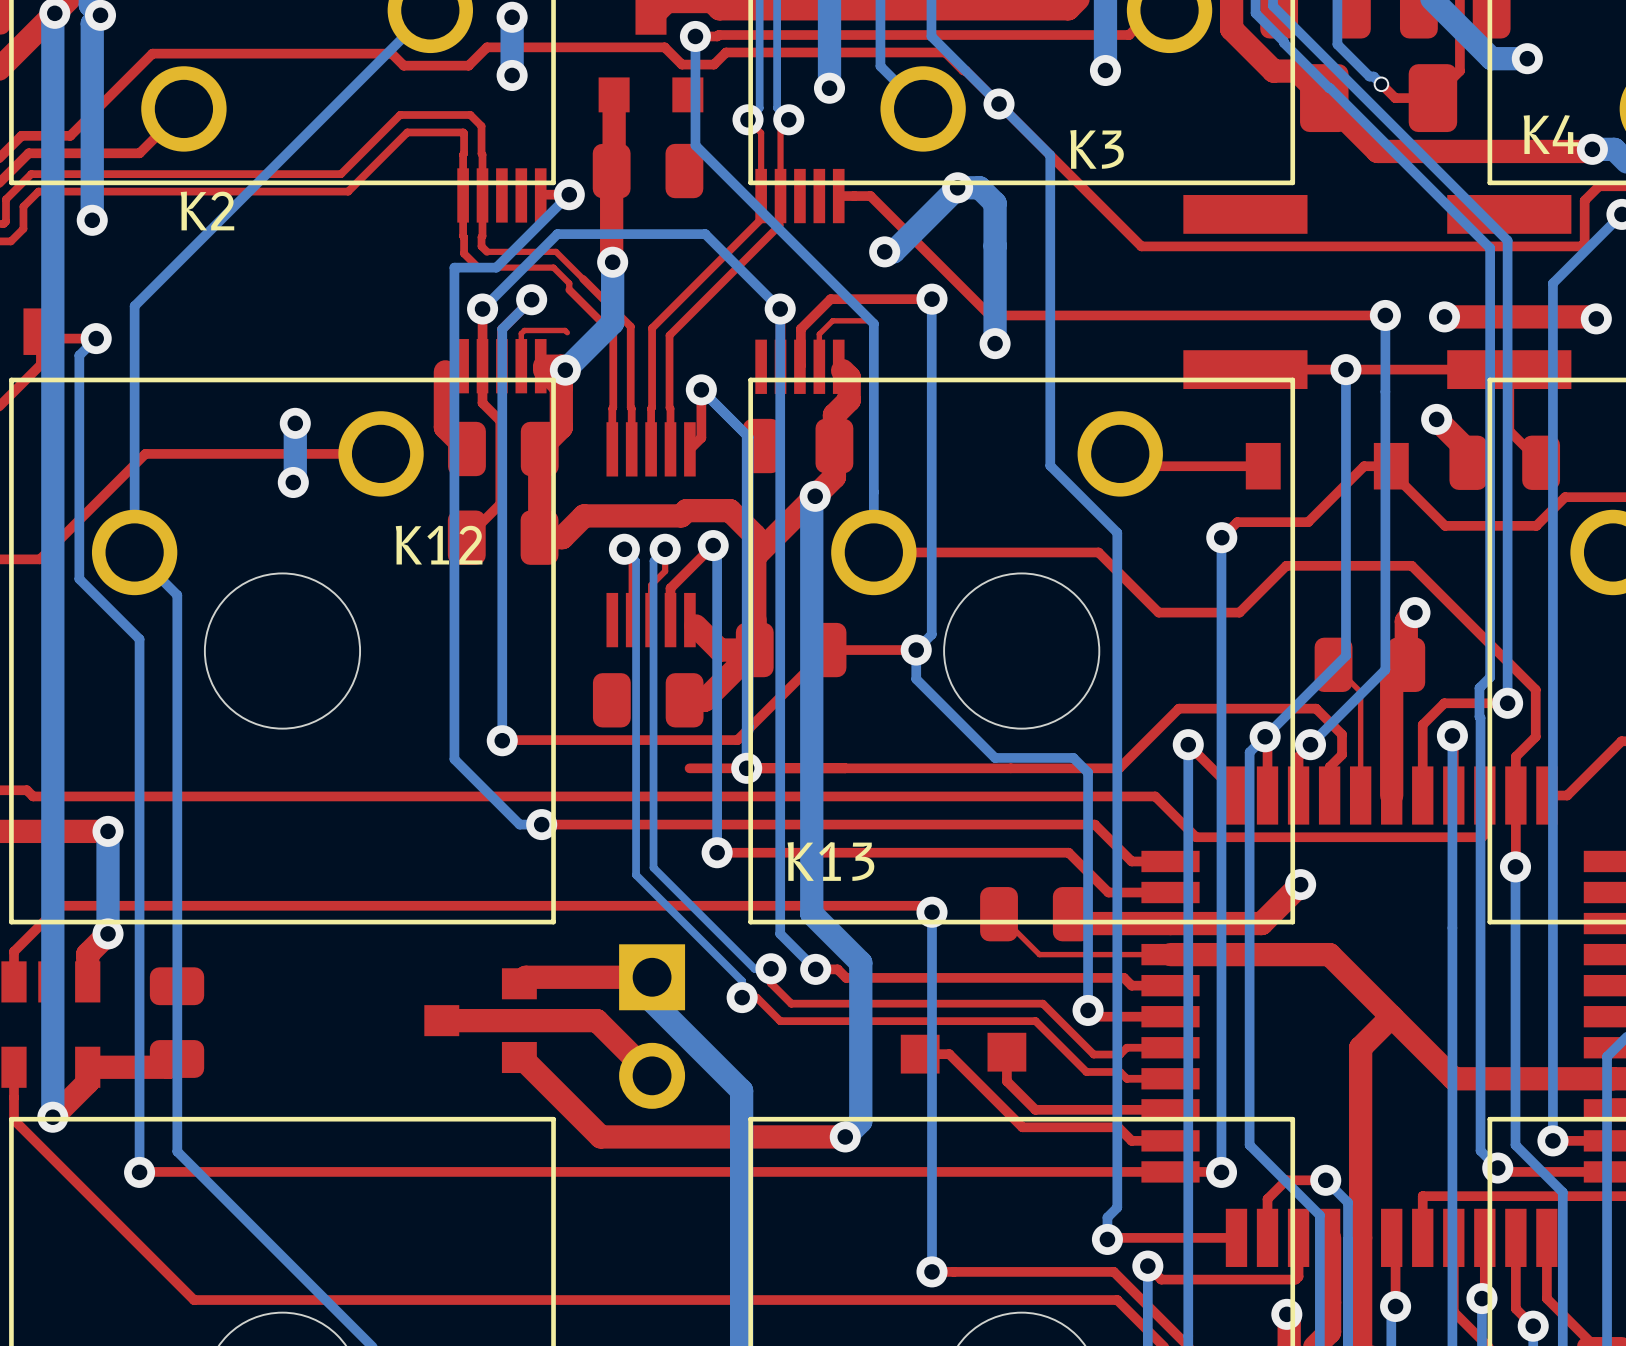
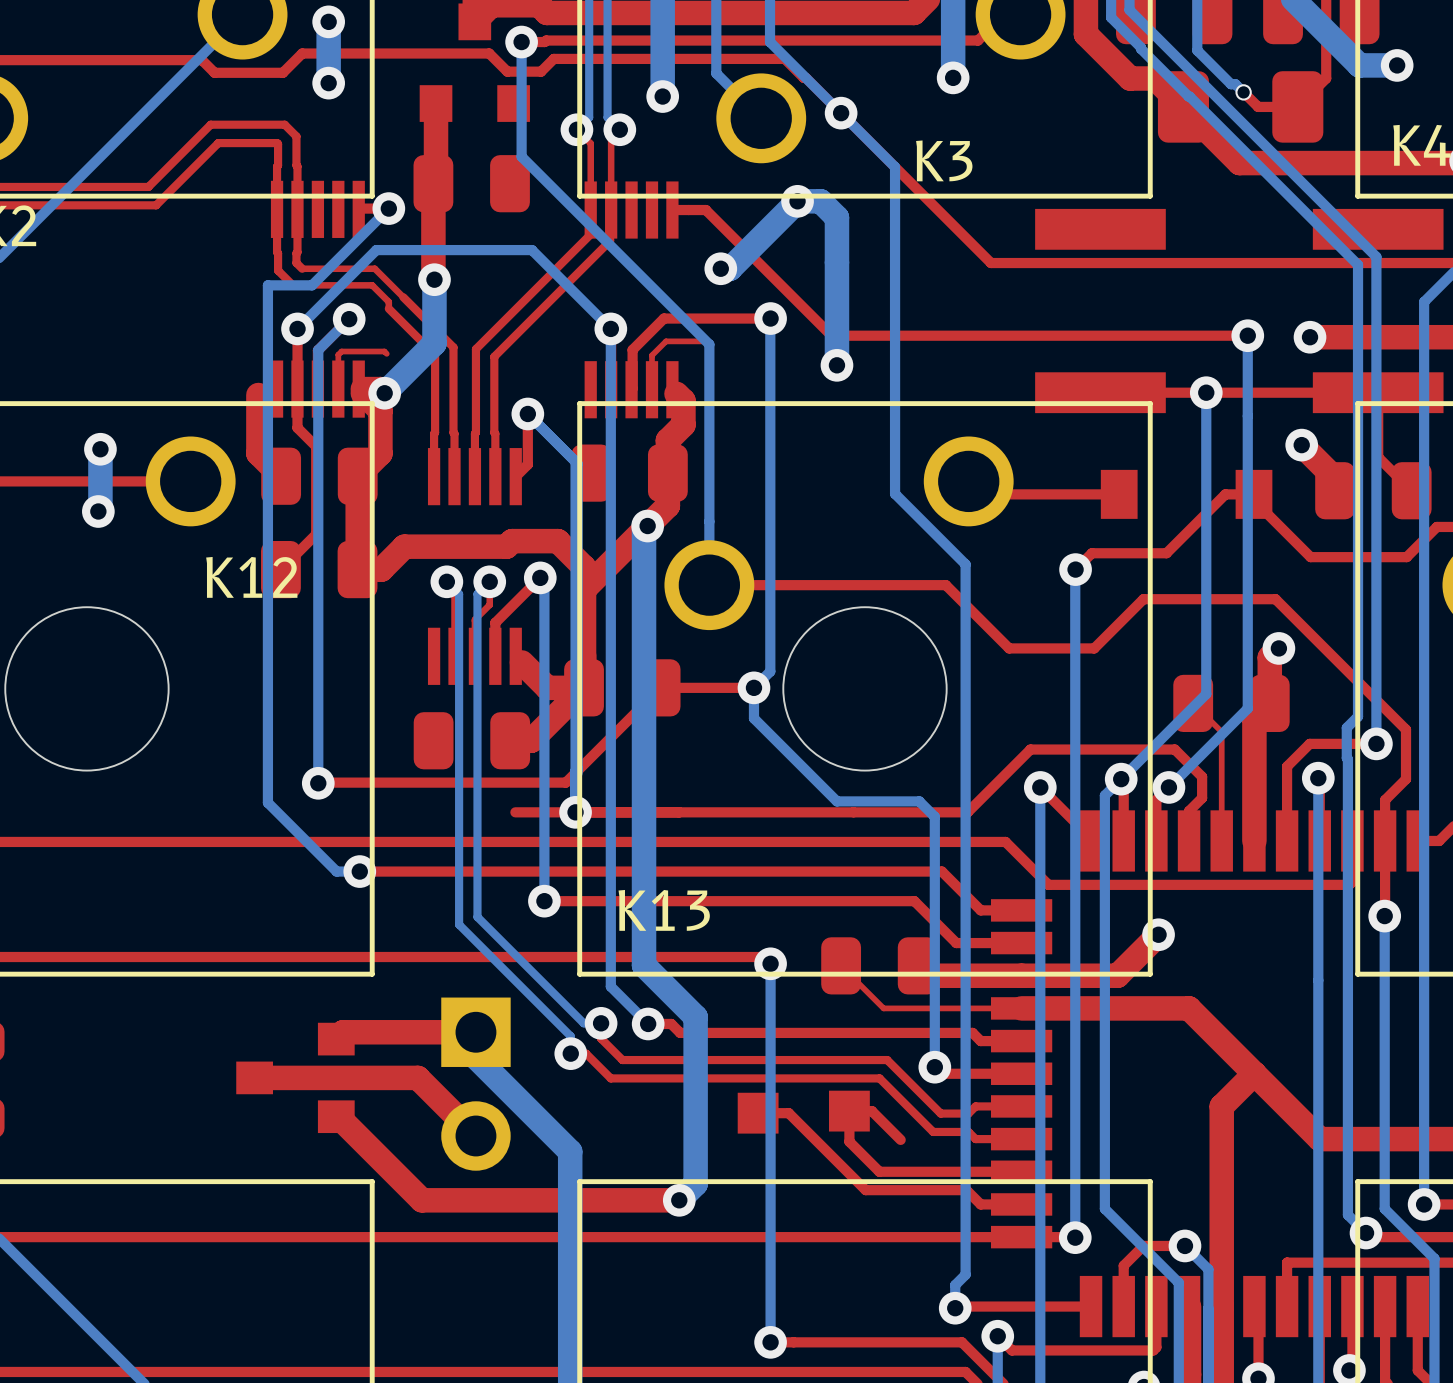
top track: none -> (849, 1111) (871, 1111) (900, 1139)

